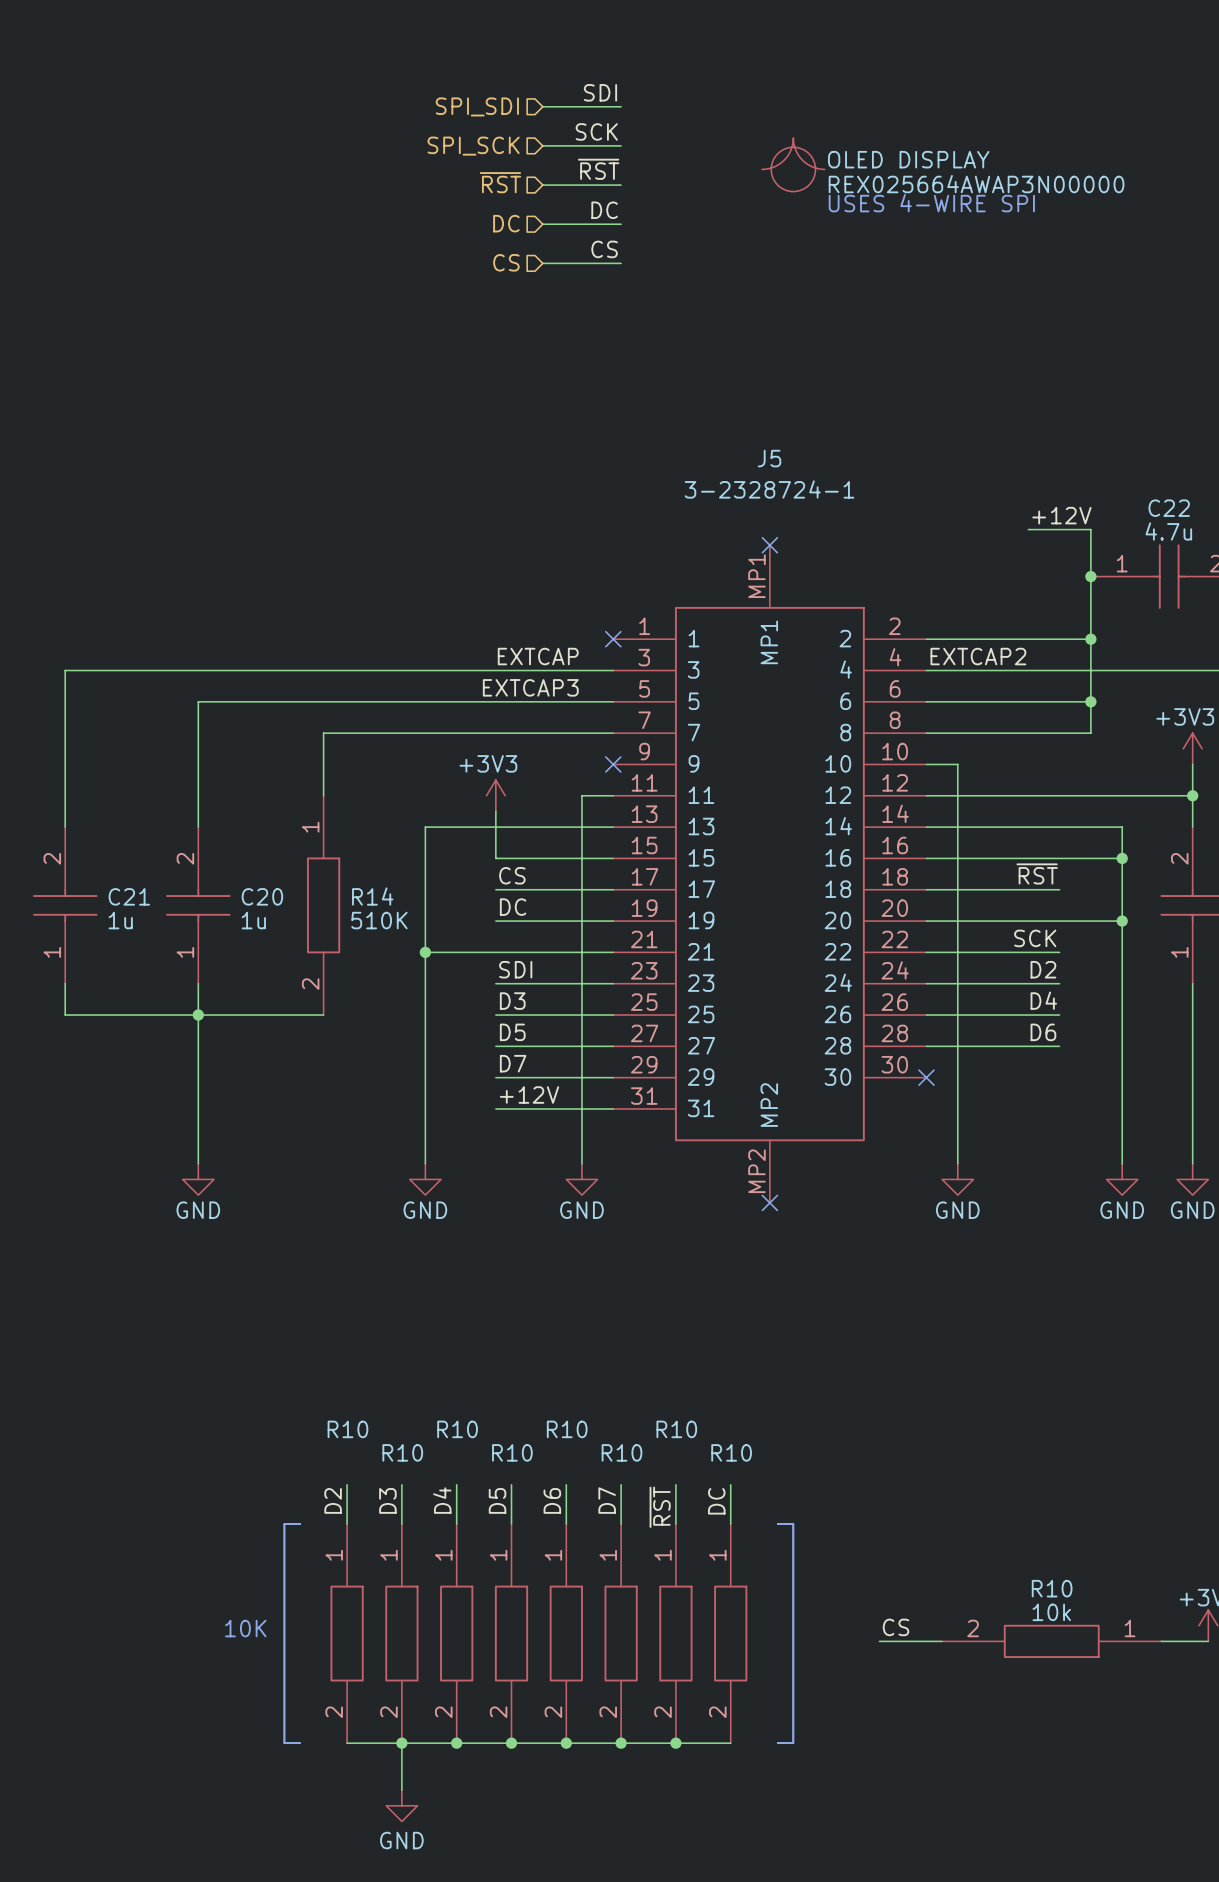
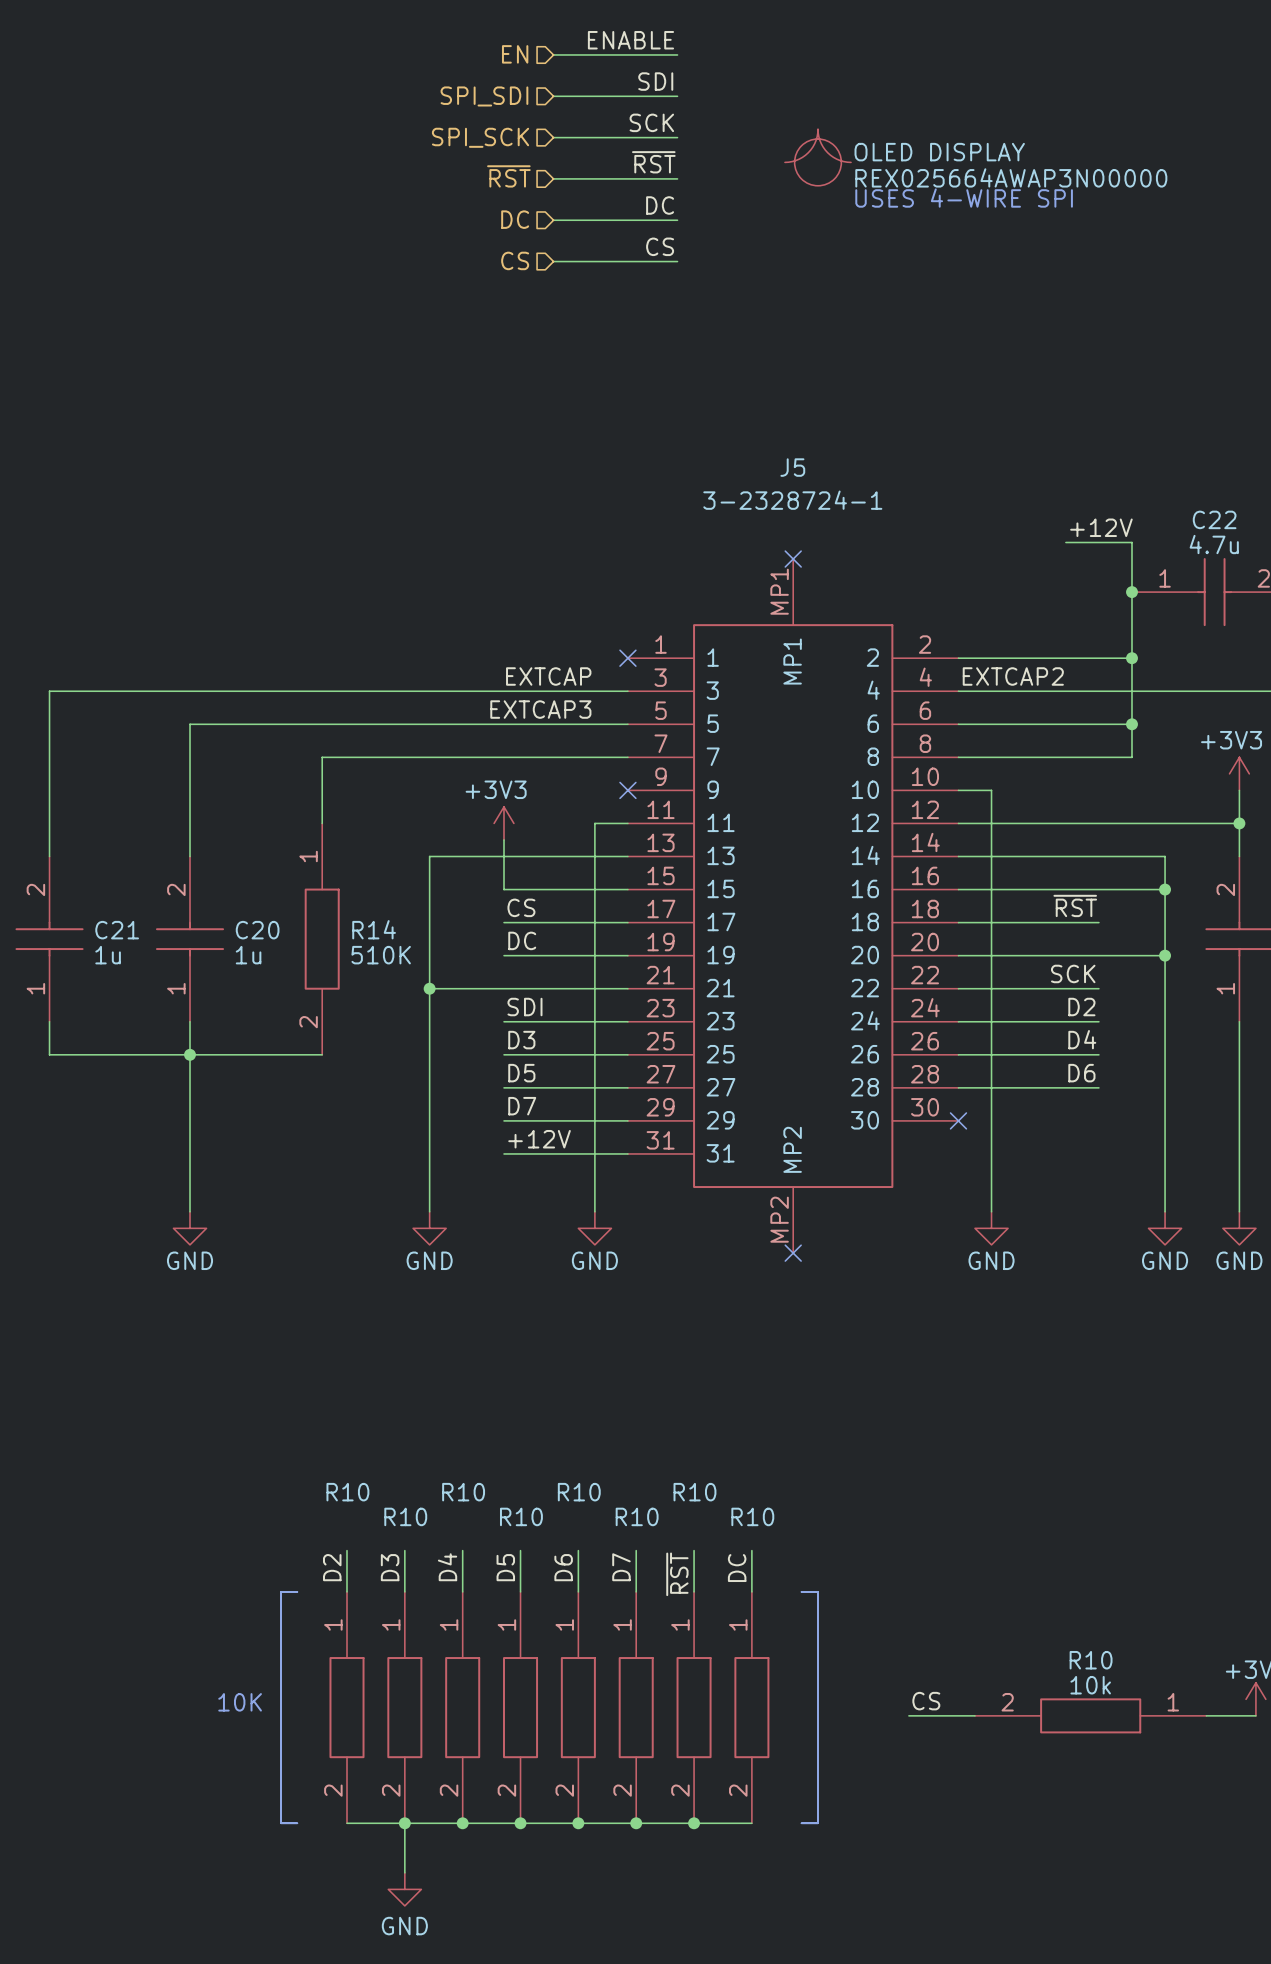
label: none -> ENABLE (630, 40)
hierarchical label: none -> EN (515, 54)
wire: none -> (553, 54) (677, 54)
label position: SDI (600, 92) -> SDI (655, 81)
wire: none -> (636, 96) (677, 96)
label position: SCK (596, 131) -> SCK (651, 122)
wire: none -> (636, 137) (677, 137)
label position: ~{RST} (598, 169) -> ~{RST} (653, 162)
wire: none -> (636, 178) (677, 178)
label position: DC (604, 210) -> DC (660, 205)
wire: none -> (636, 220) (677, 220)
label position: CS (604, 249) -> CS (660, 246)
wire: none -> (636, 261) (677, 261)

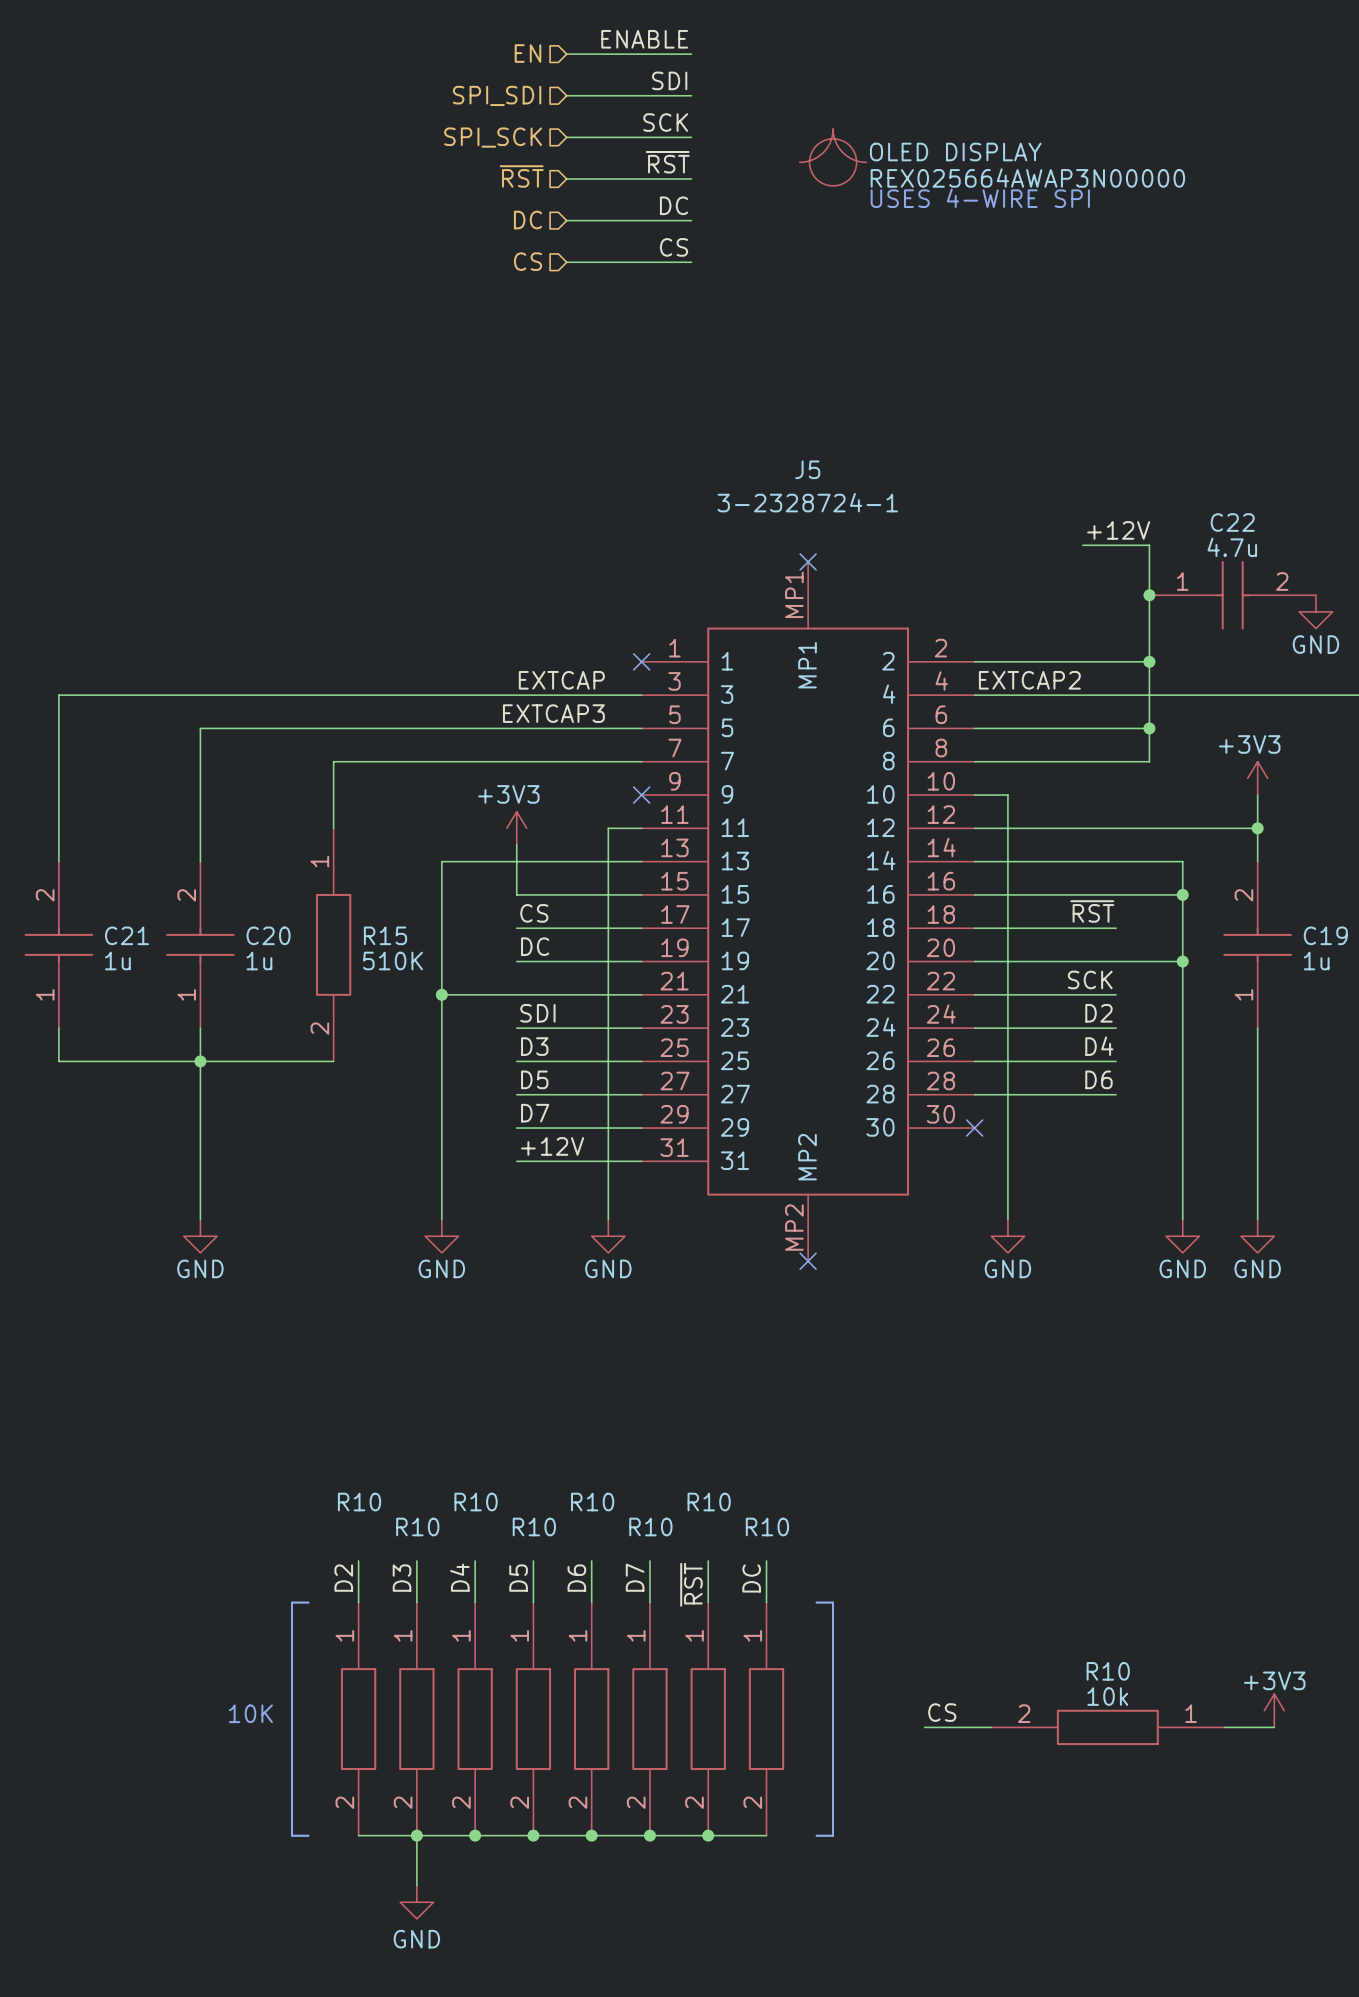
R14 name: R14 (374, 929) -> R15 (385, 935)

